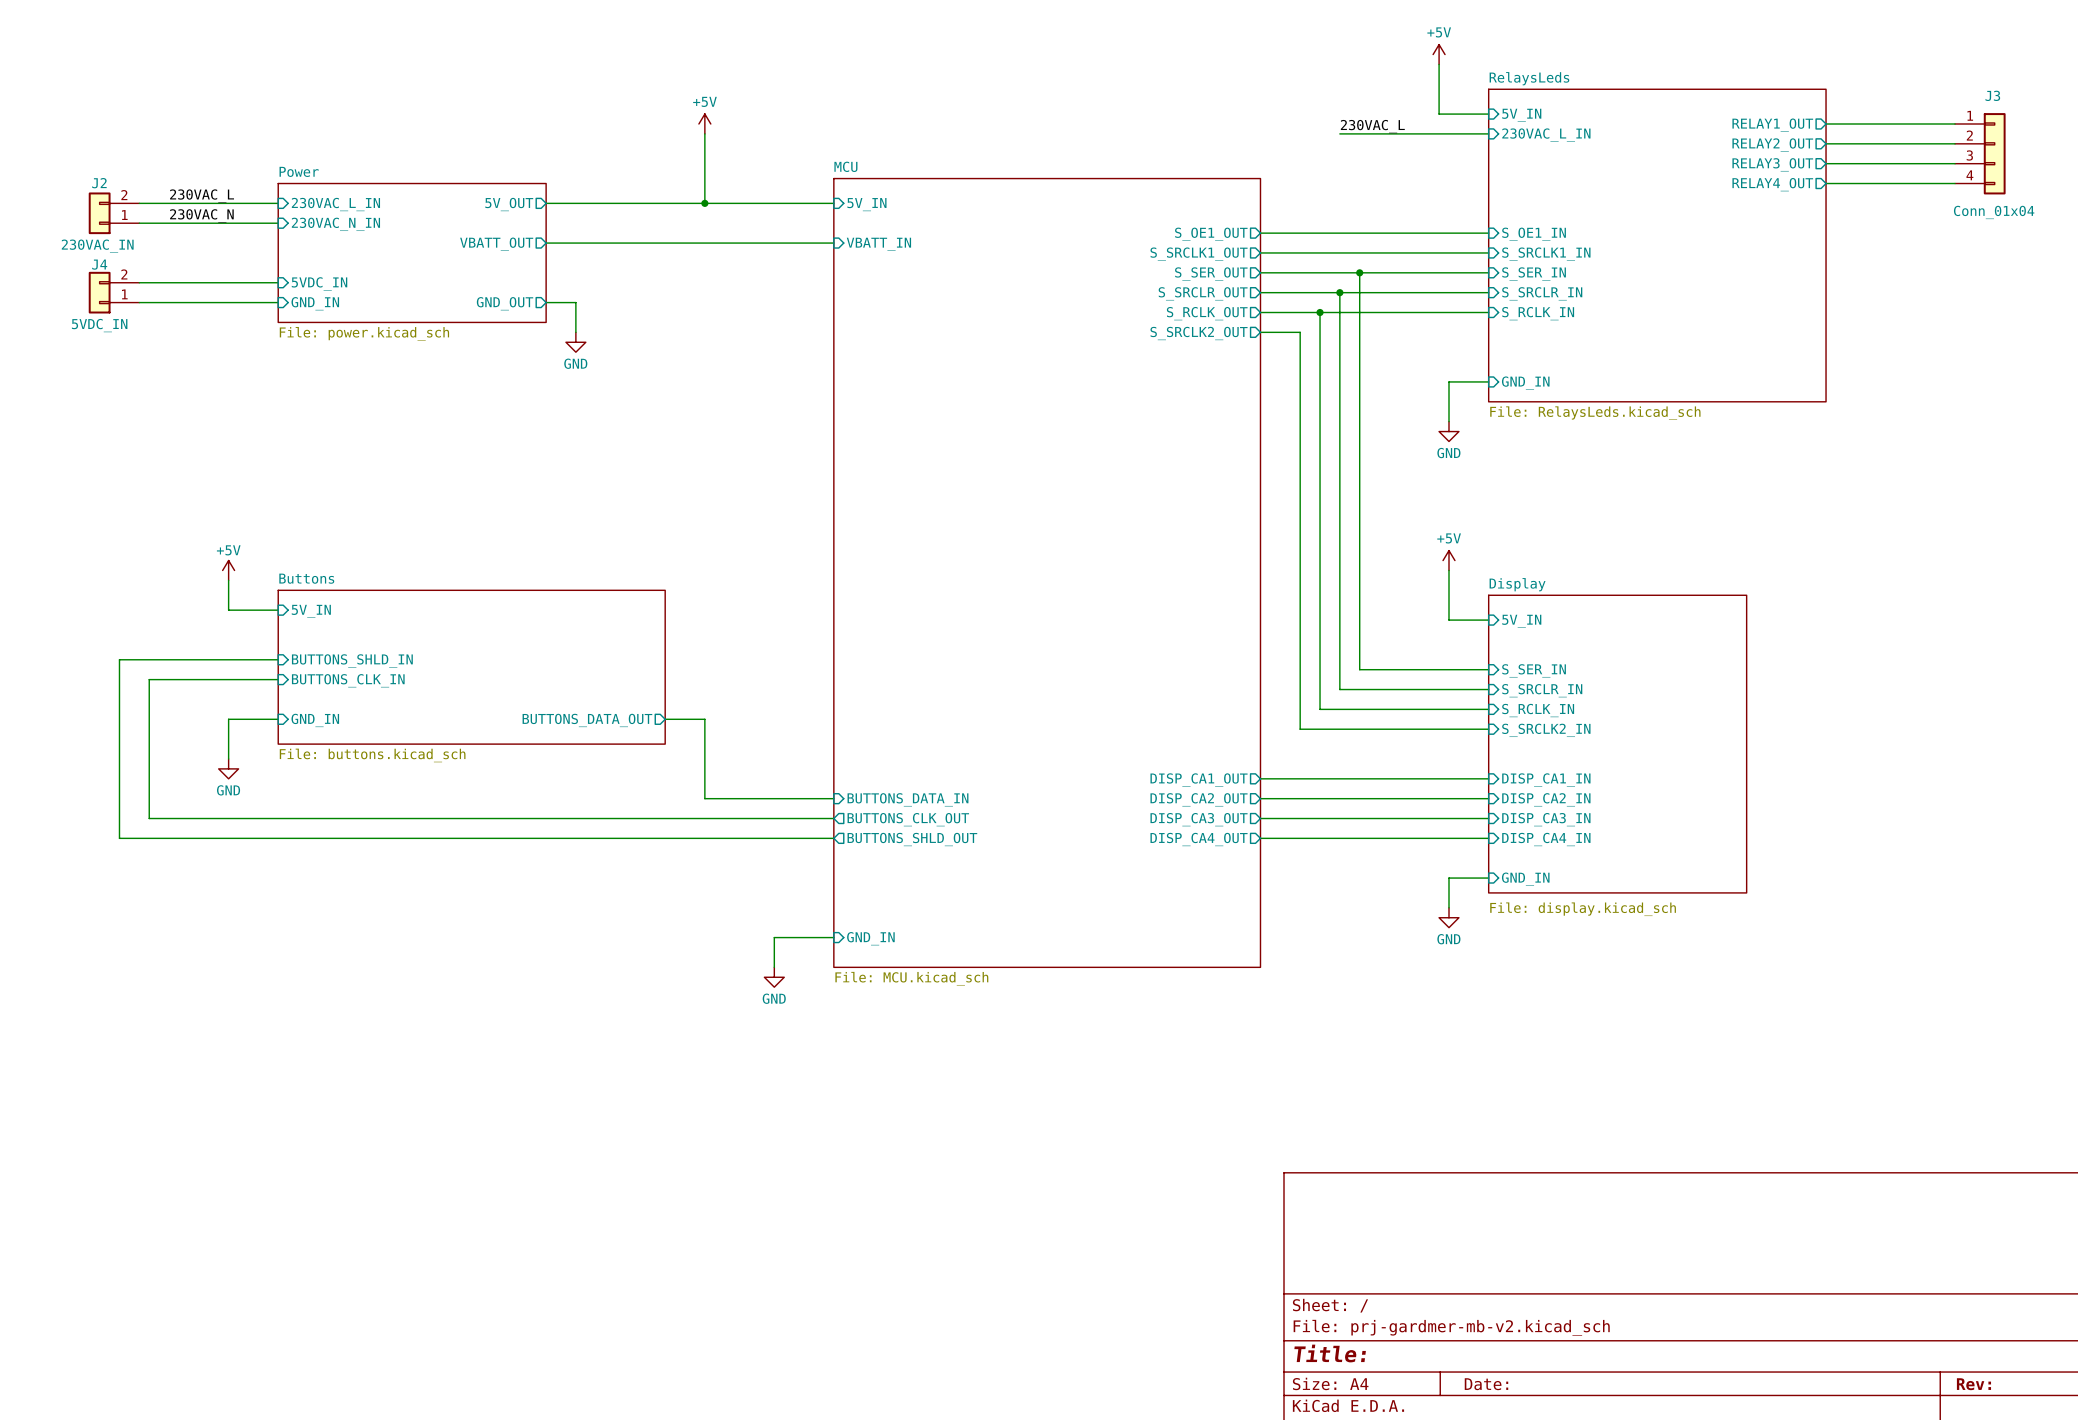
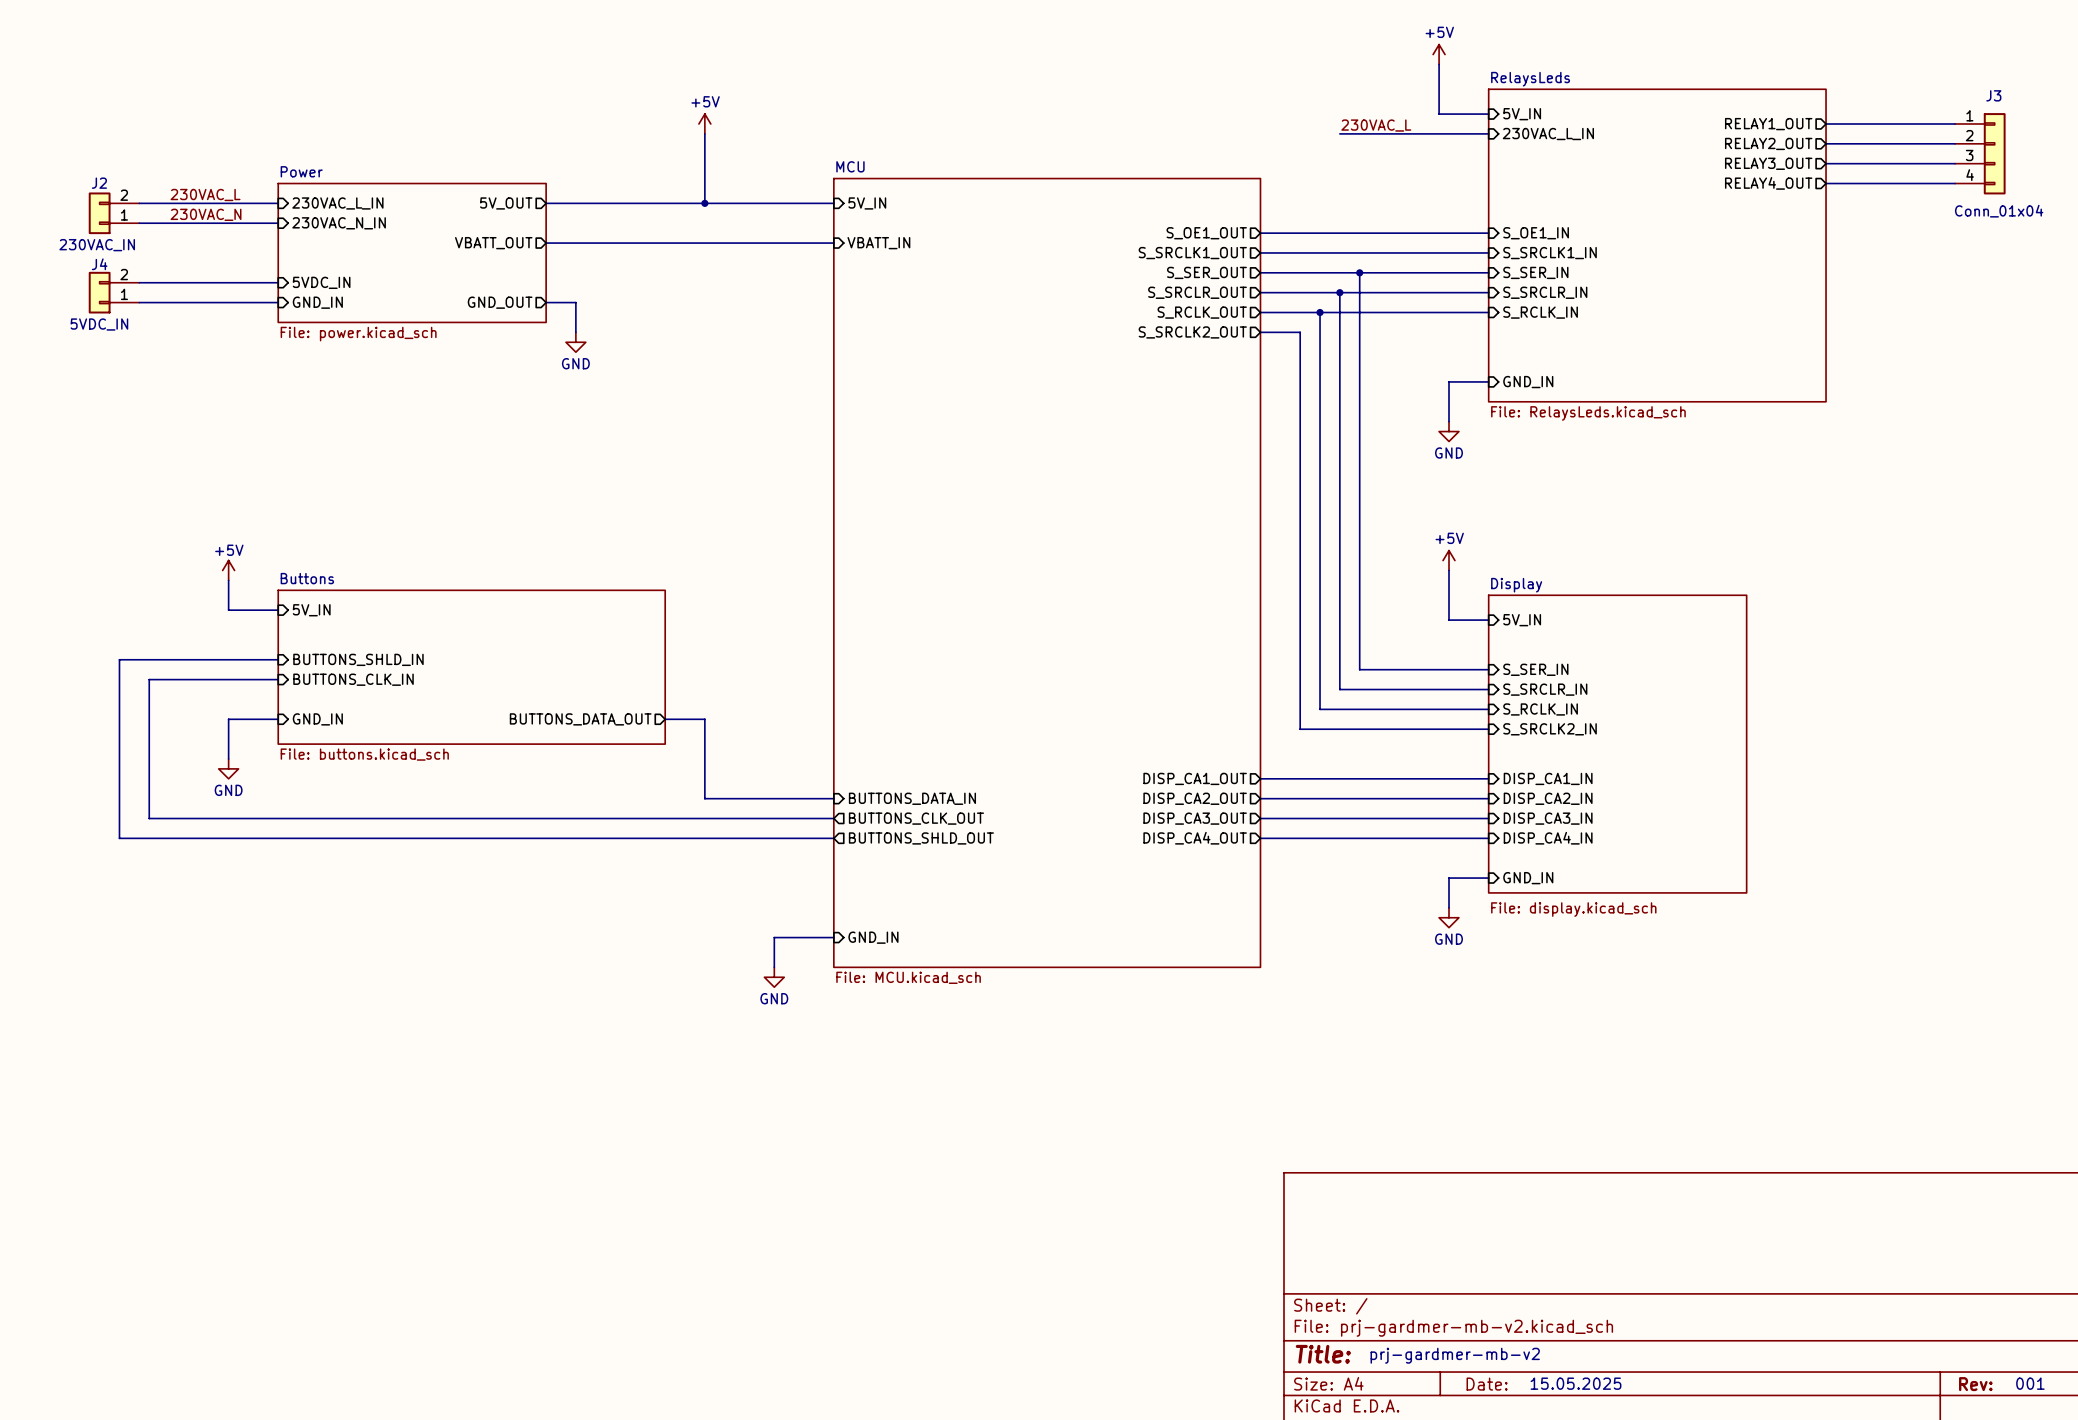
text: none -> prj-gardmer-mb-v2 (1455, 1355)
text: none -> 15.05.2025 (1575, 1383)
text: none -> 001 (2030, 1383)

